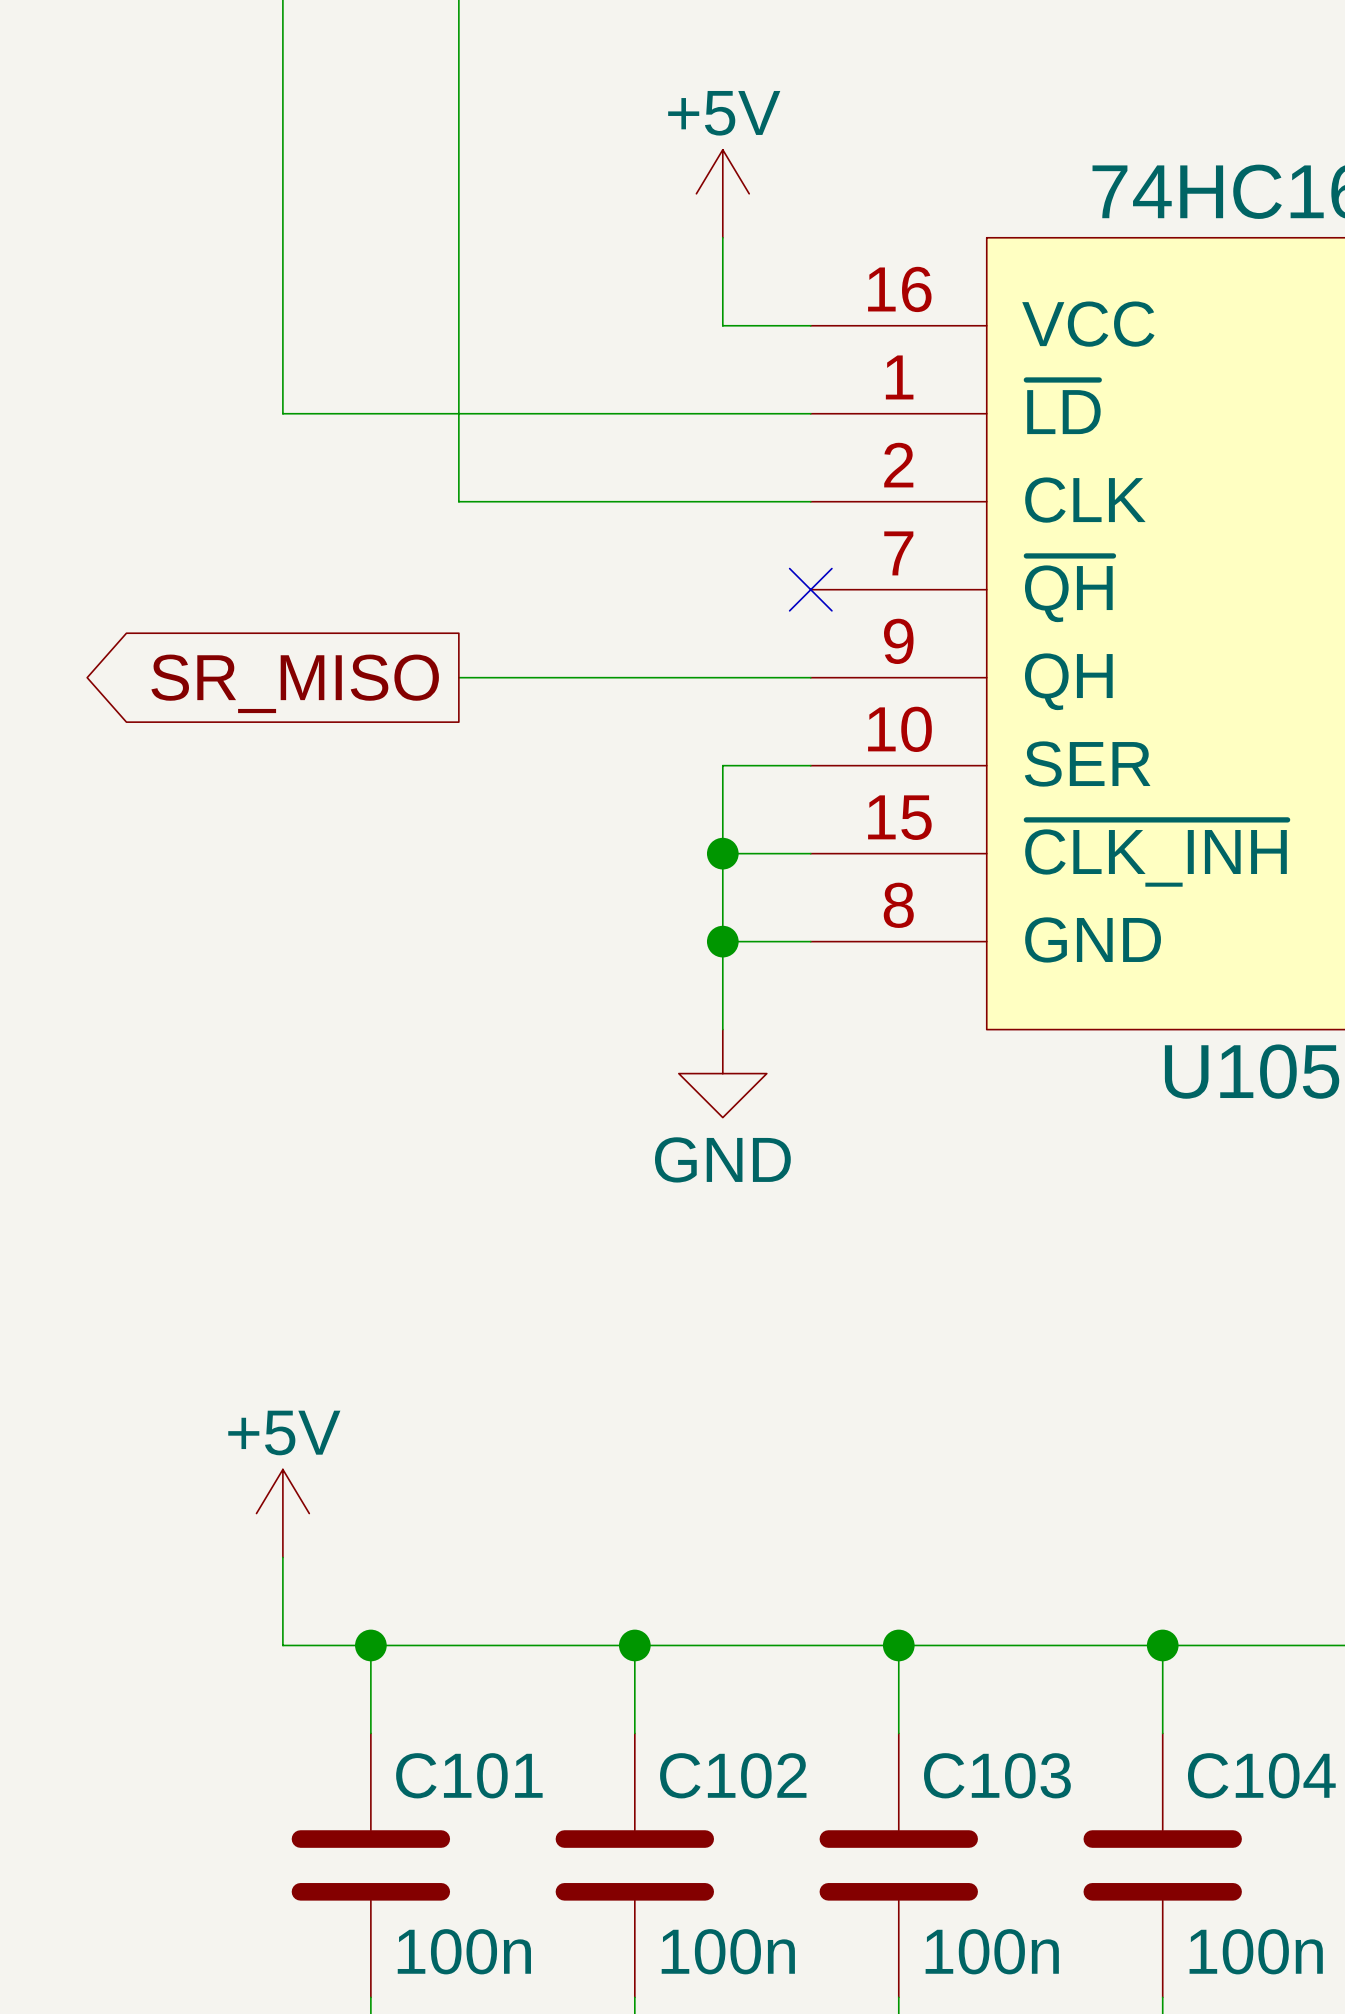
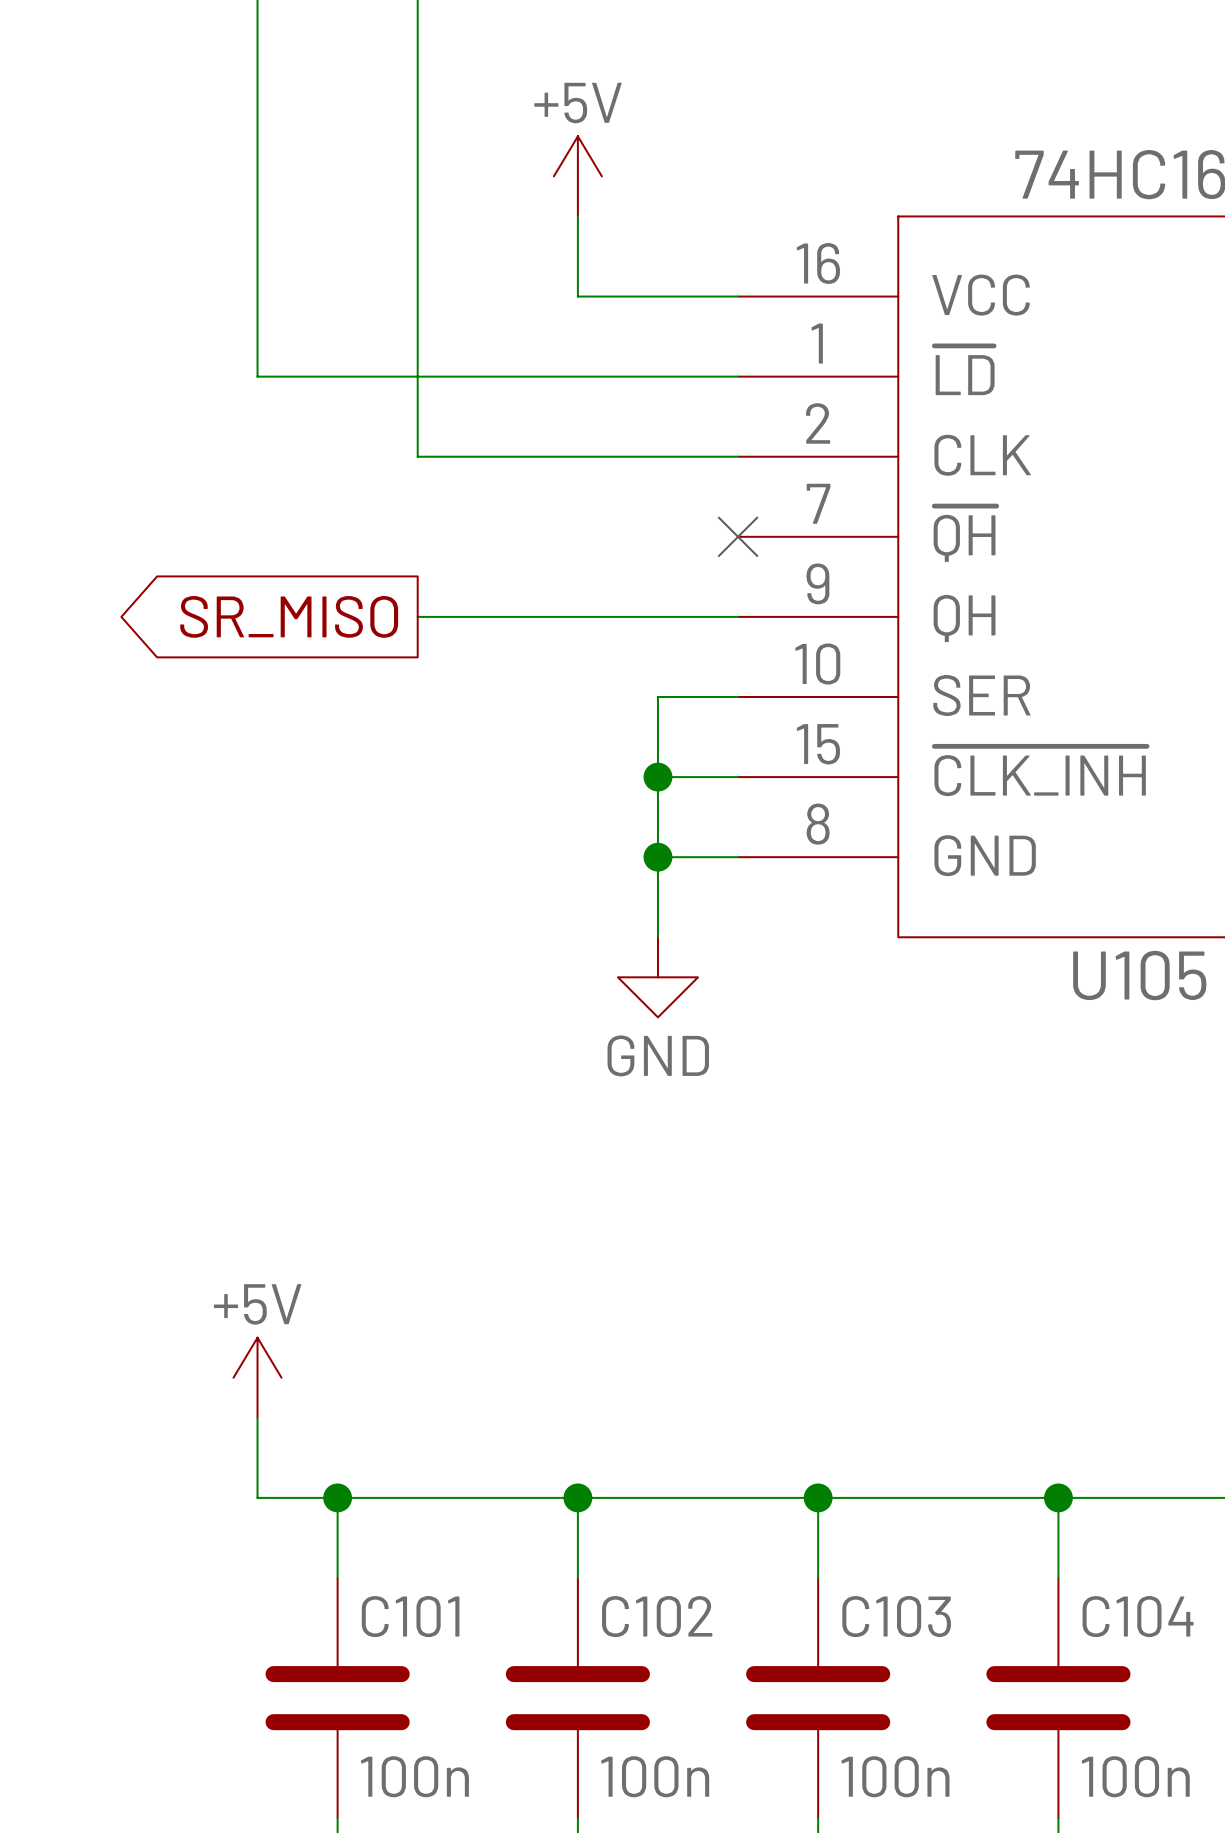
power symbol position: +5V (722, 193) -> +5V (577, 176)
wire: (722, 237) (722, 325) -> (577, 216) (577, 296) (657, 296)

